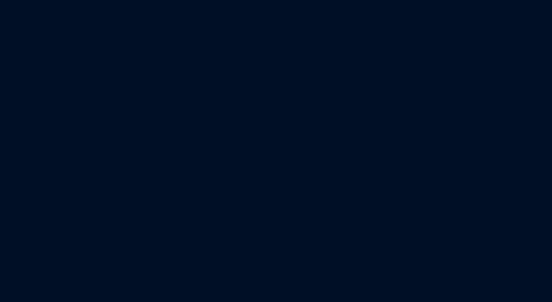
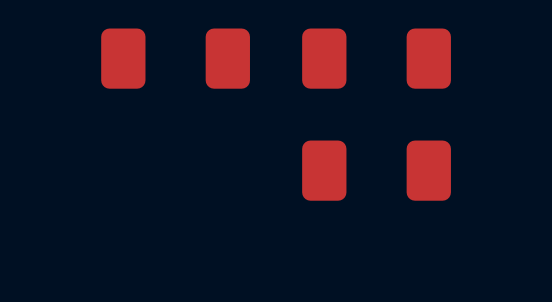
part: none -> (175, 58)
part: none -> (376, 58)
part: none -> (376, 170)

